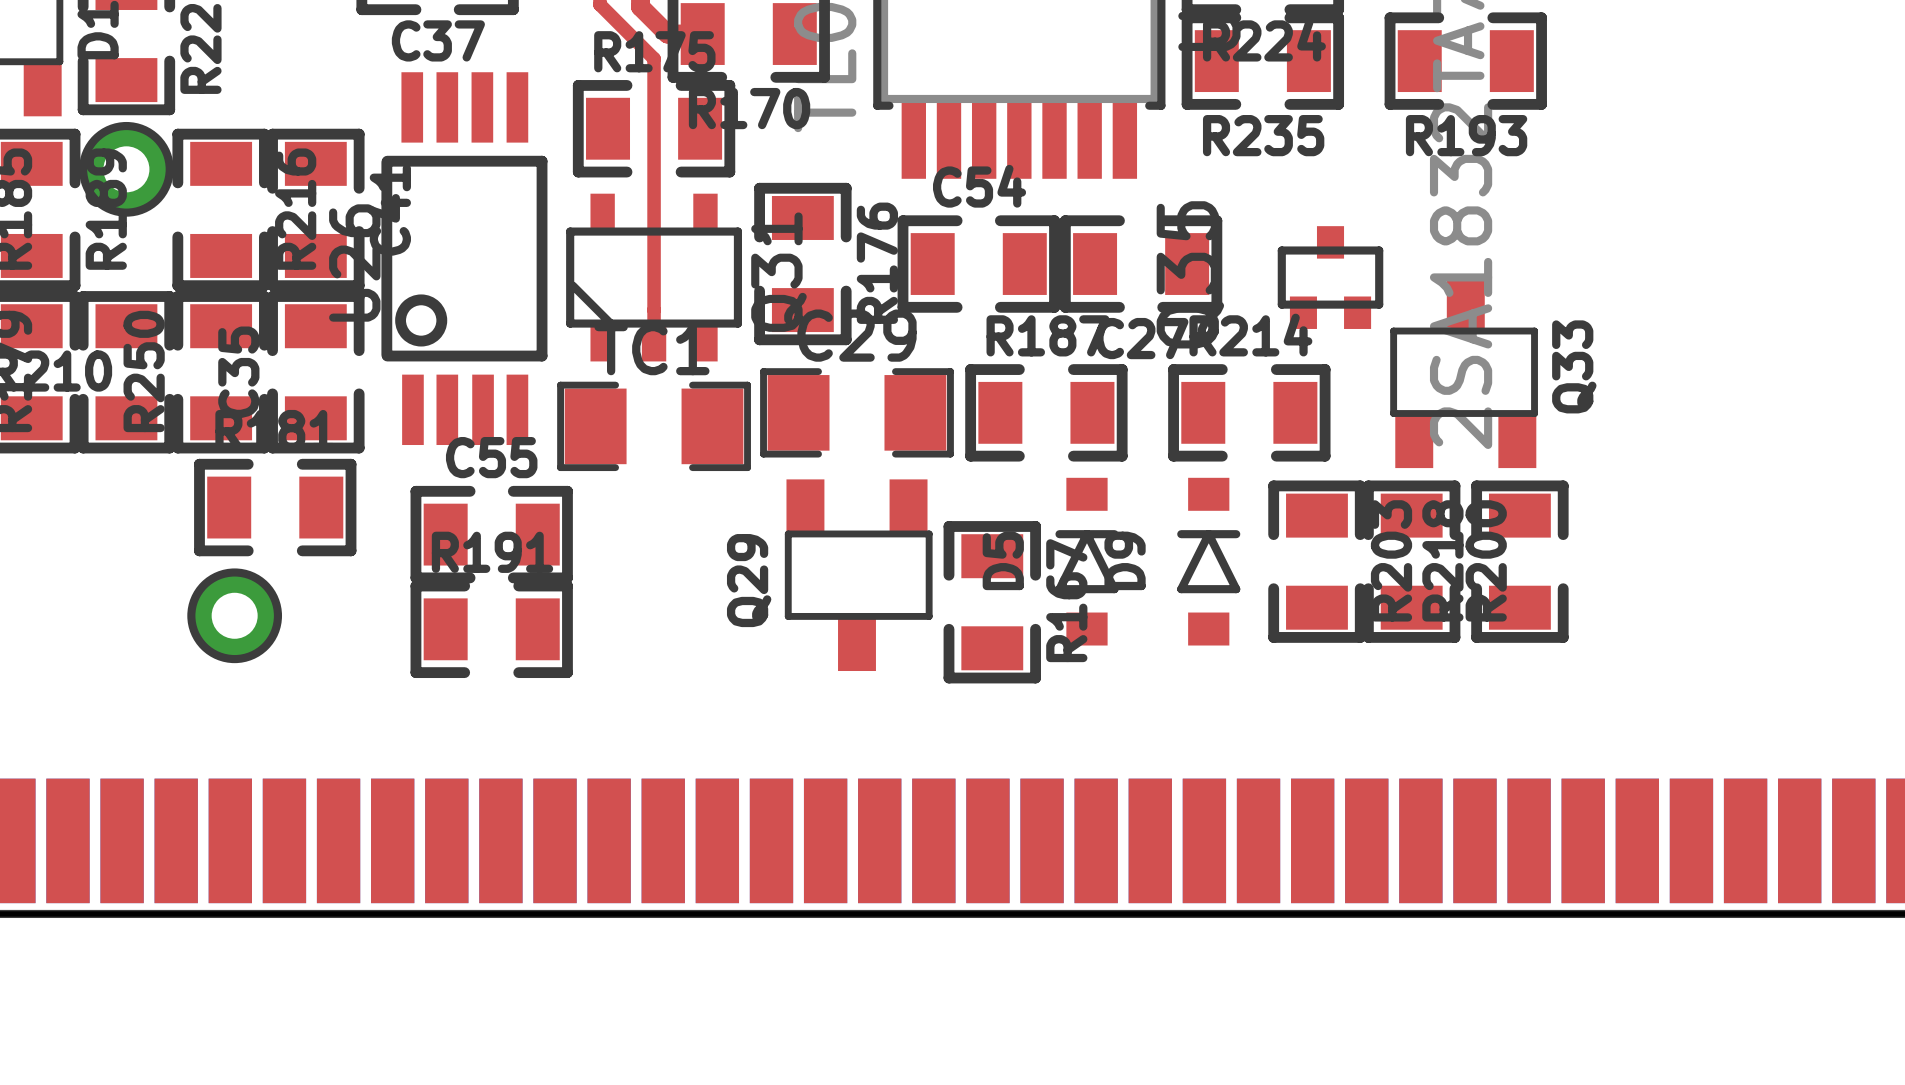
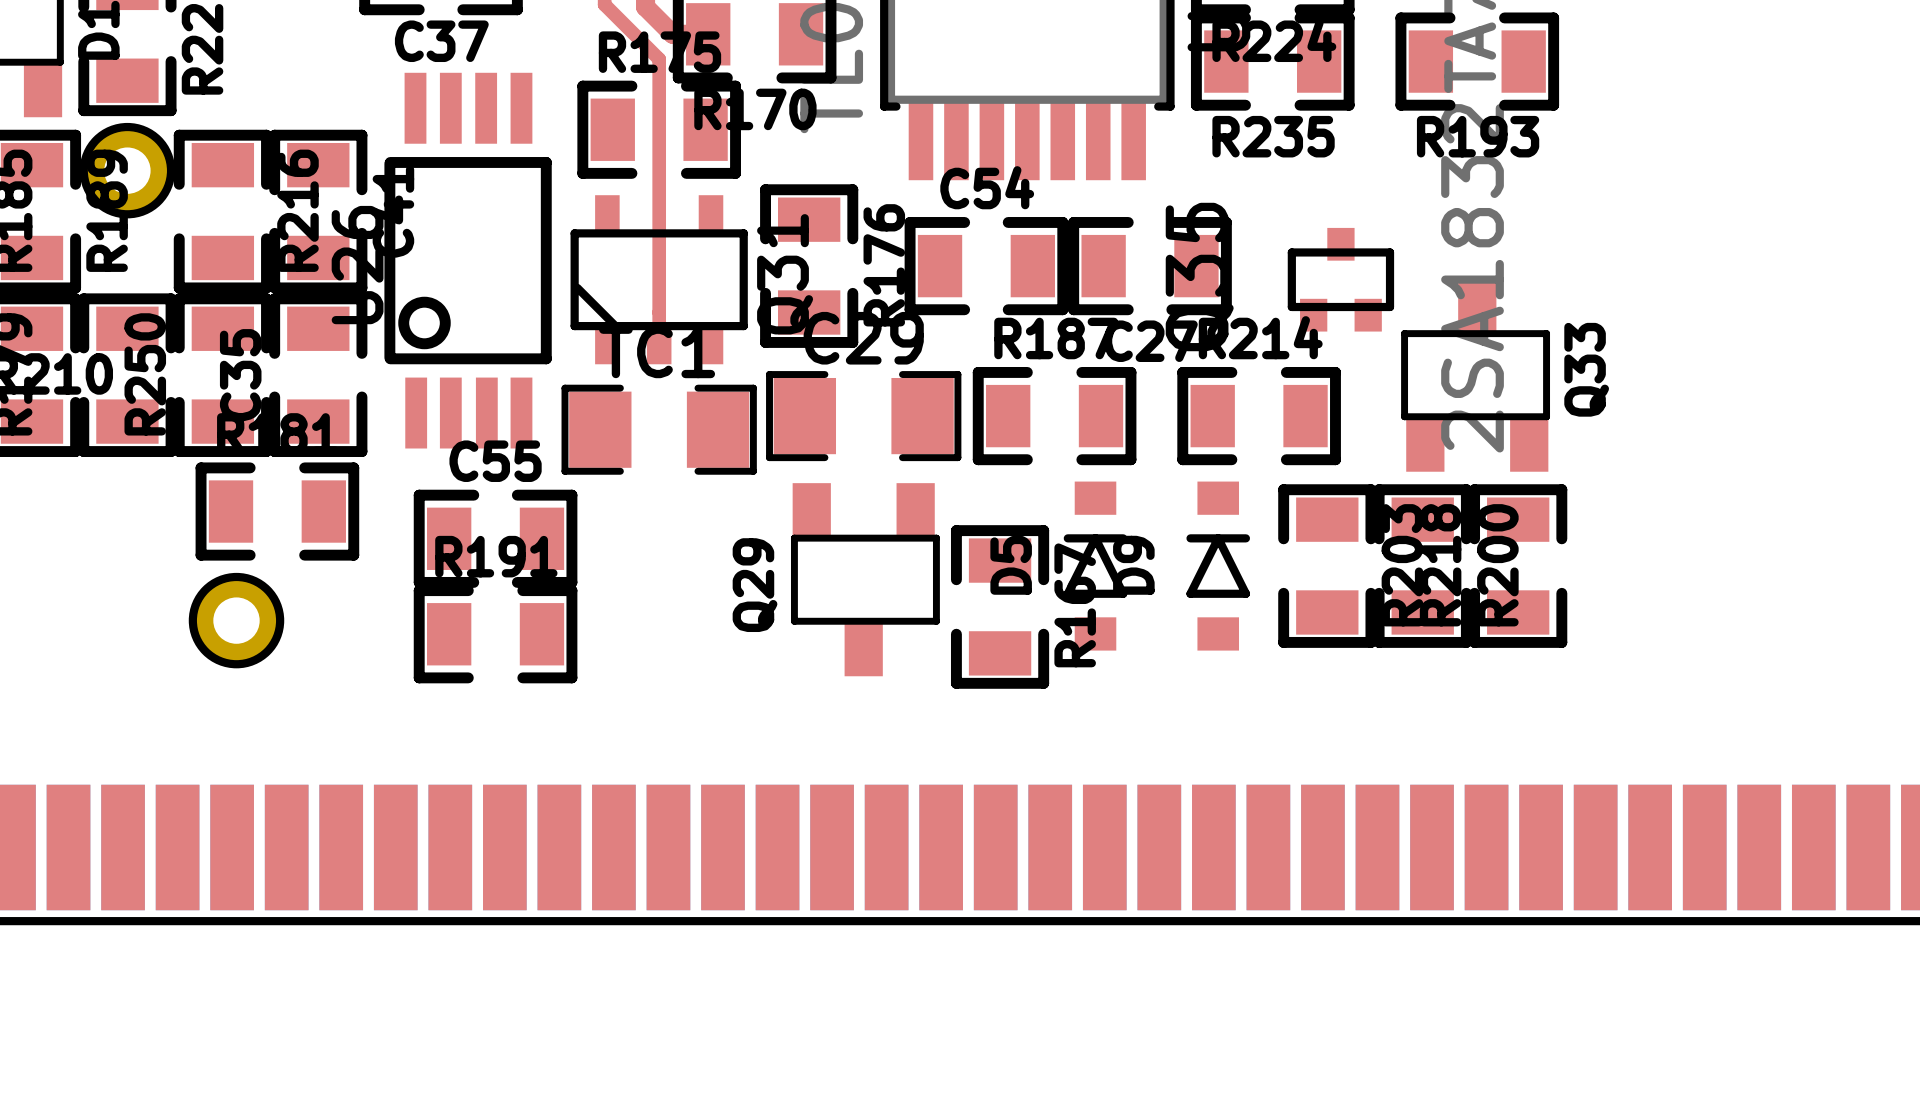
R218 position: (1519, 561) -> (1518, 566)

